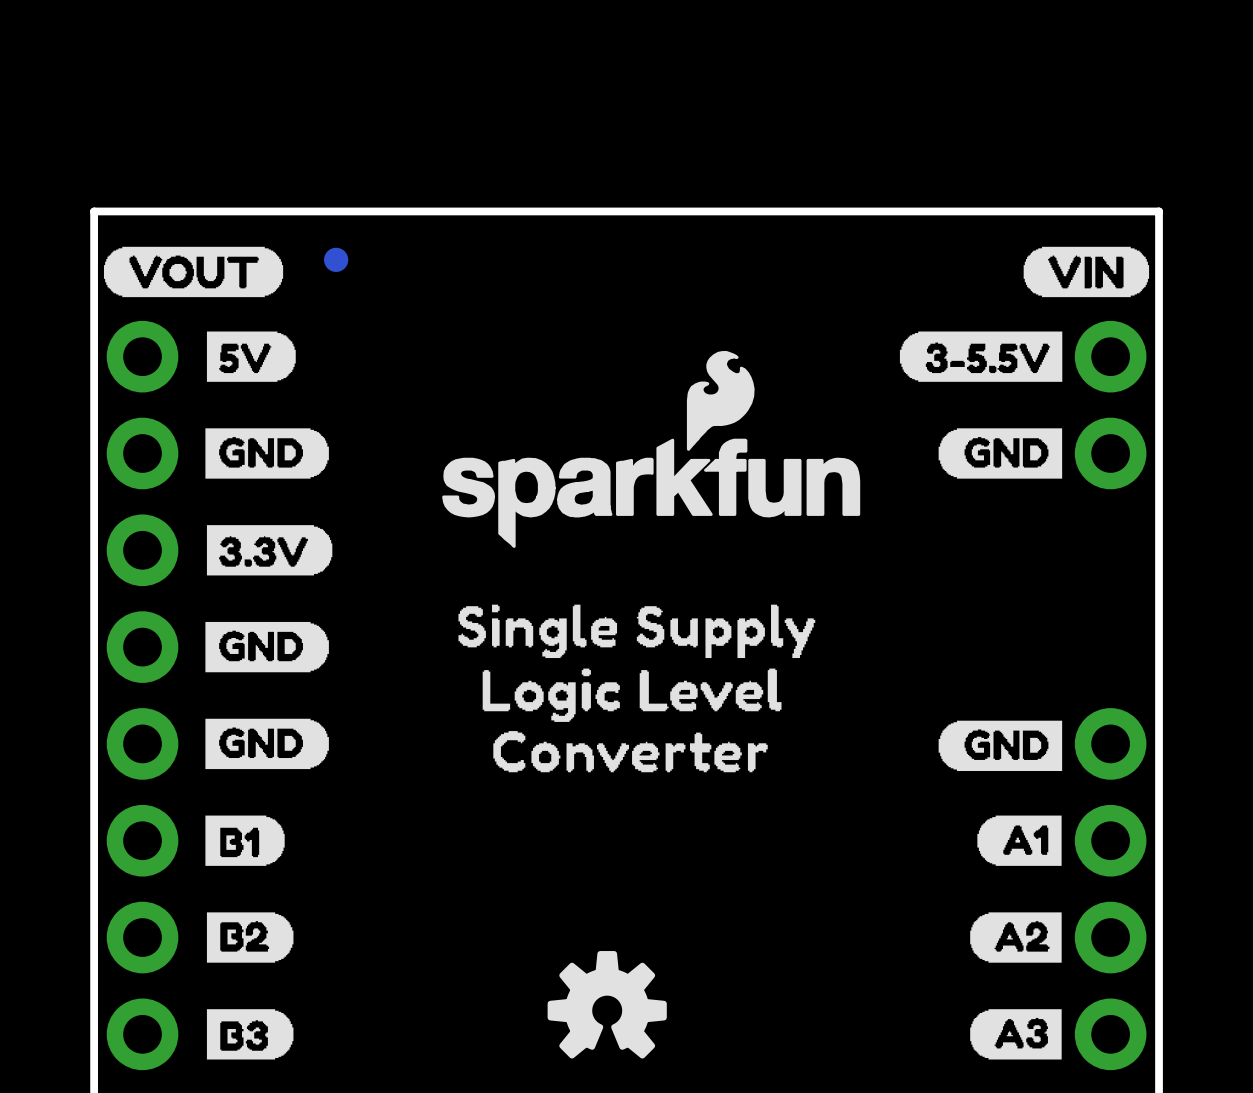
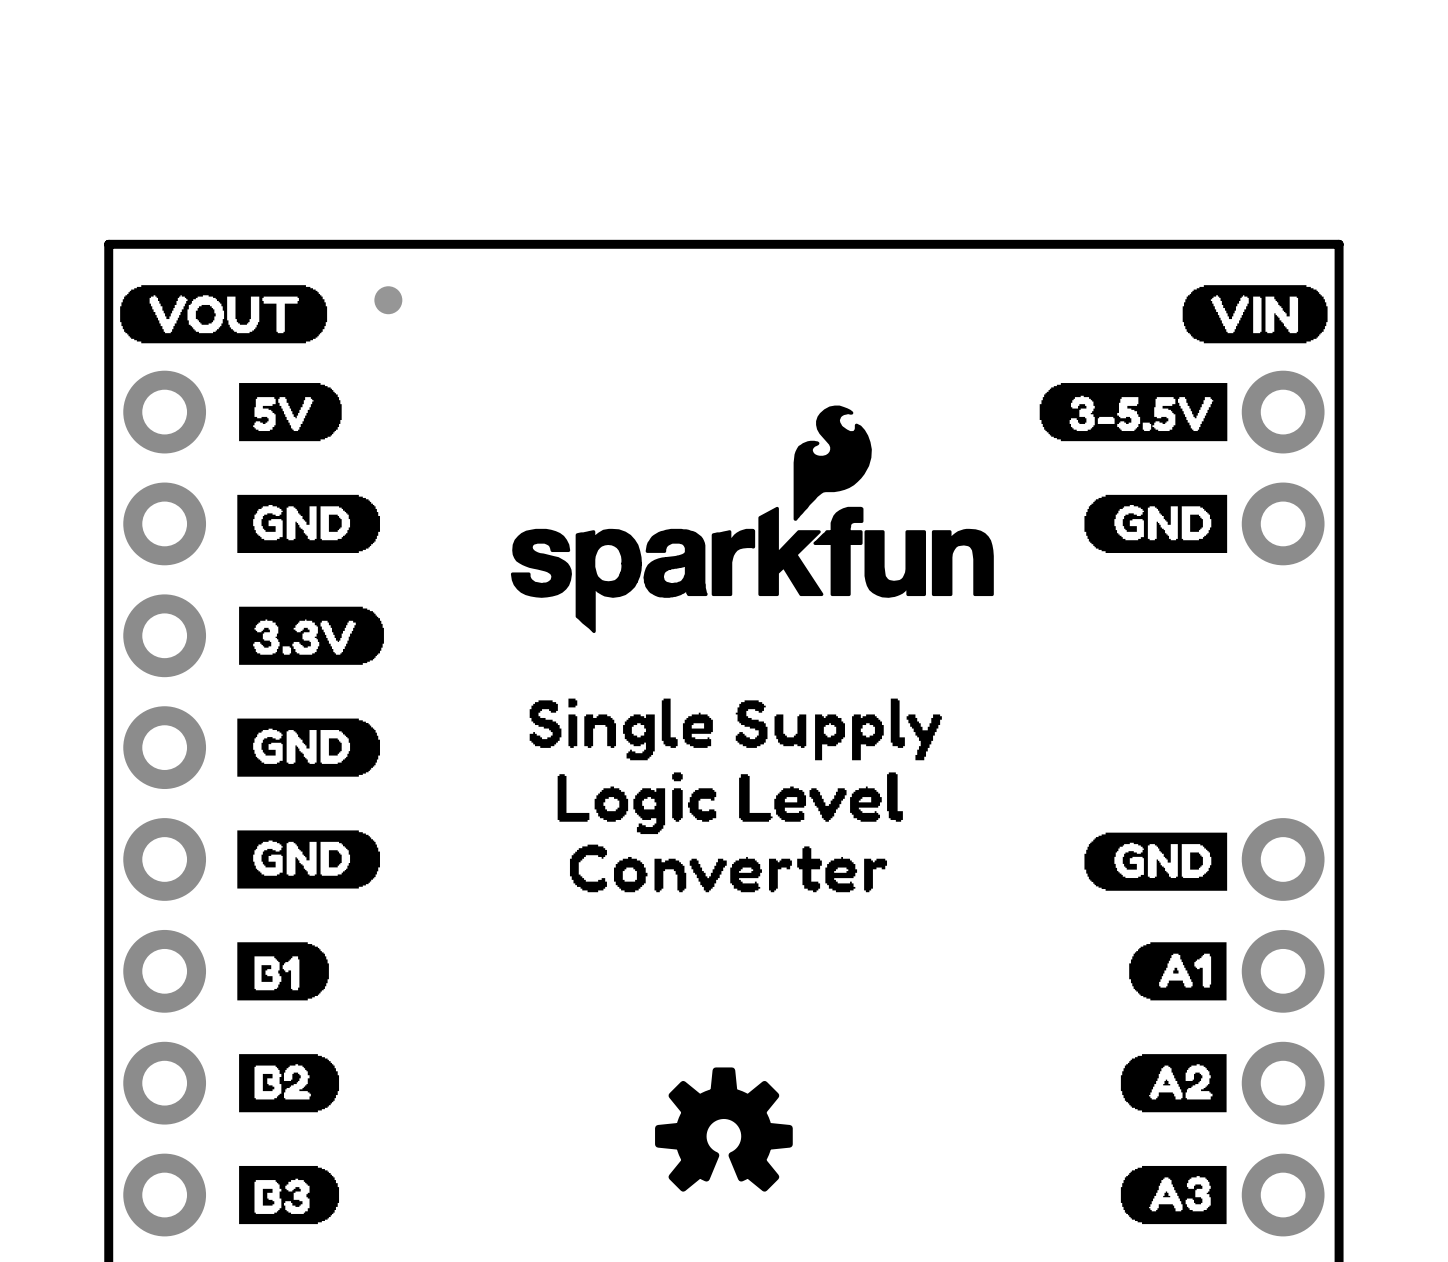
drawing position: (607, 1004) -> (723, 1129)

